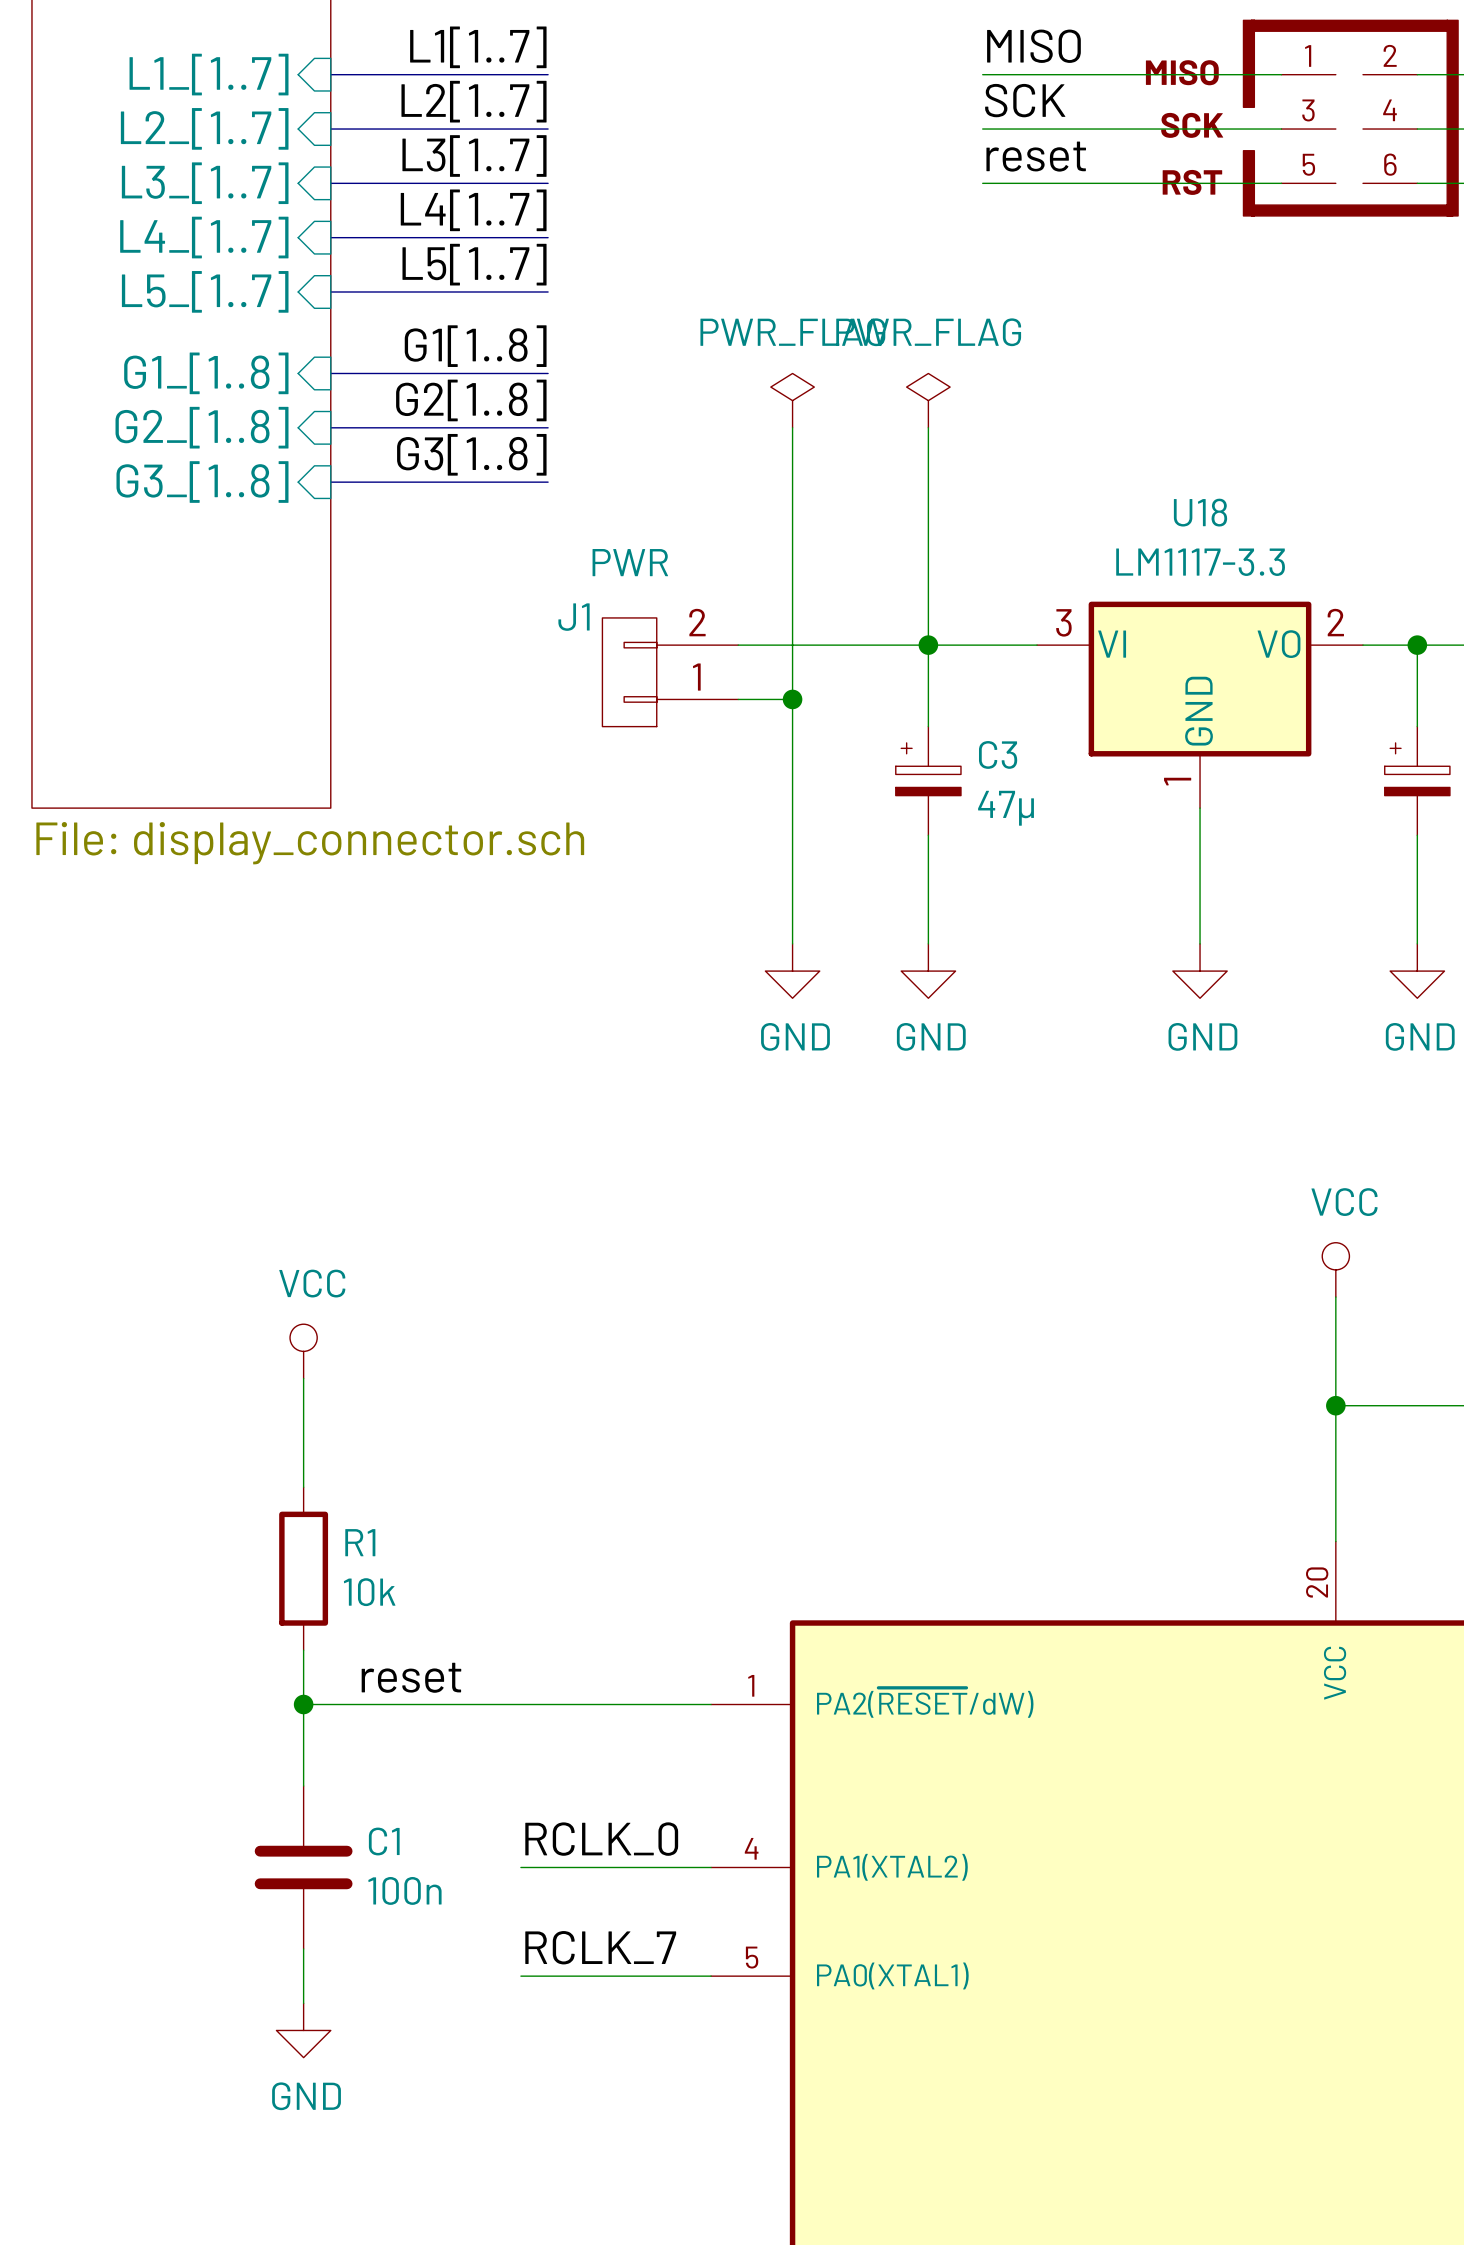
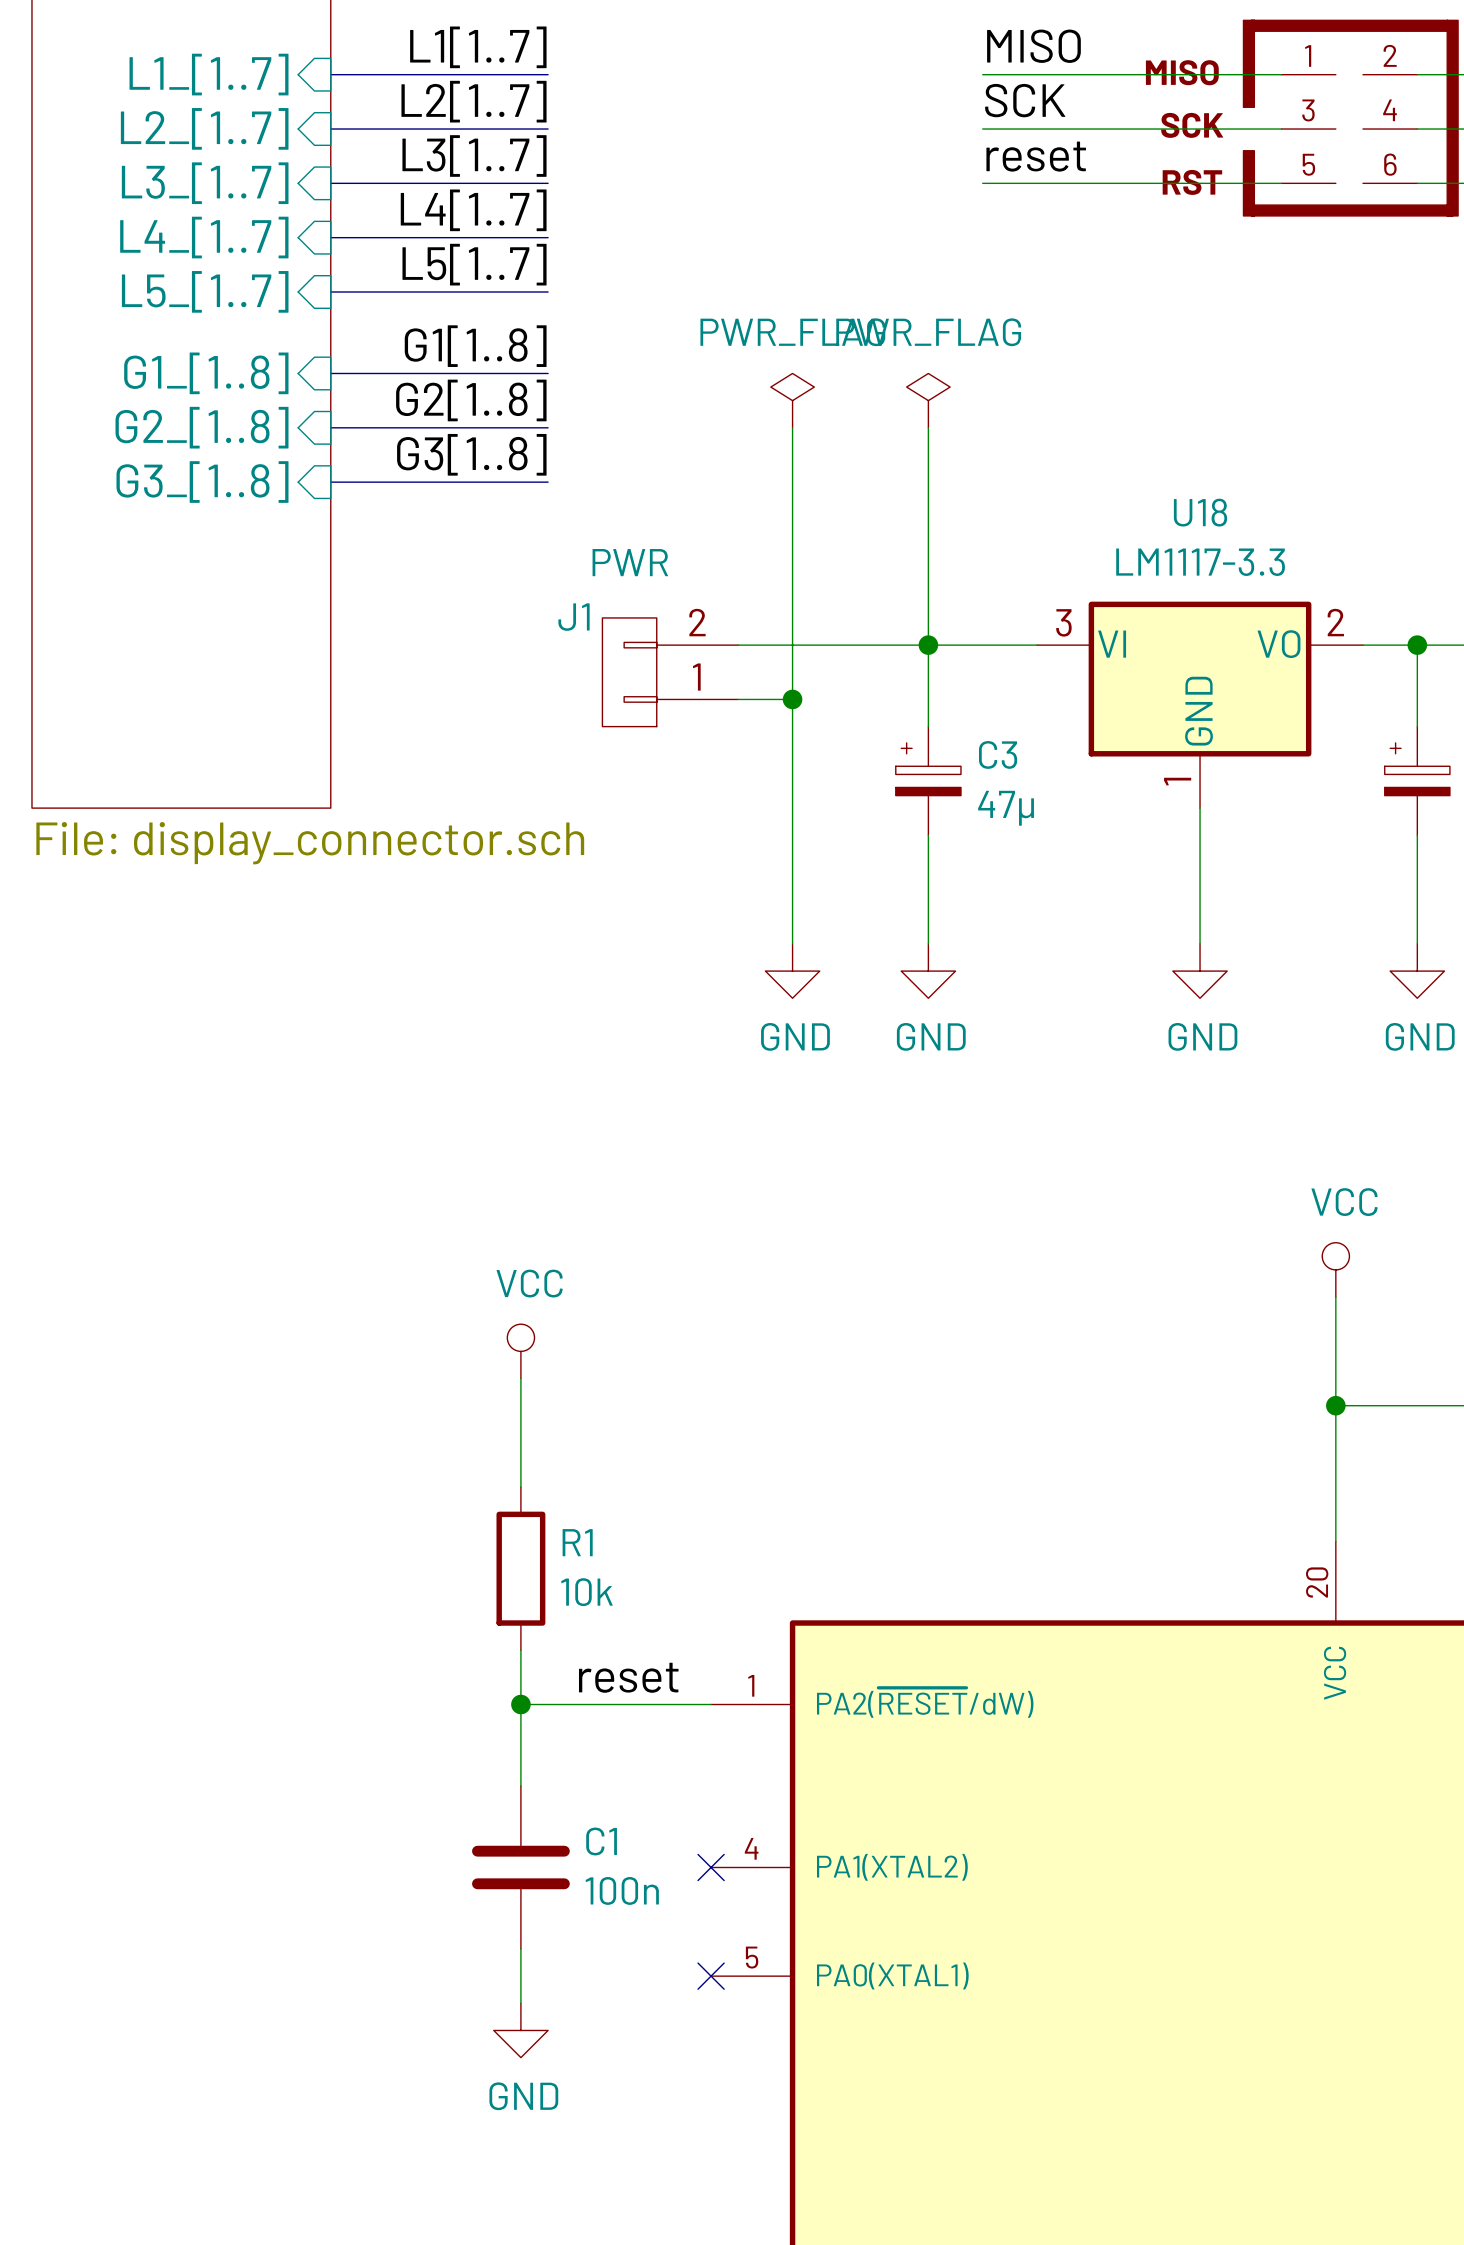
power symbol position: VCC (303, 1351) -> VCC (520, 1351)
wire: (303, 1378) (303, 1487) -> (520, 1378) (520, 1487)
R1 position: (303, 1568) -> (520, 1568)
wire: (303, 1650) (303, 1786) -> (520, 1650) (520, 1786)
label position: reset (411, 1677) -> reset (628, 1677)
wire: (303, 1704) (520, 1704) -> none
junction: (303, 1704) -> none
junction: none -> (520, 1704)
label: RCLK_0 (601, 1839) -> none
C1 position: (303, 1867) -> (520, 1867)
wire: (520, 1867) (711, 1867) -> none
no-connect mark: none -> (711, 1867)
label: RCLK_7 (600, 1947) -> none
wire: (303, 1948) (303, 2003) -> (520, 1948) (520, 2003)
wire: (520, 1976) (711, 1976) -> none
no-connect mark: none -> (711, 1976)
power symbol position: GND (303, 2030) -> GND (520, 2030)

